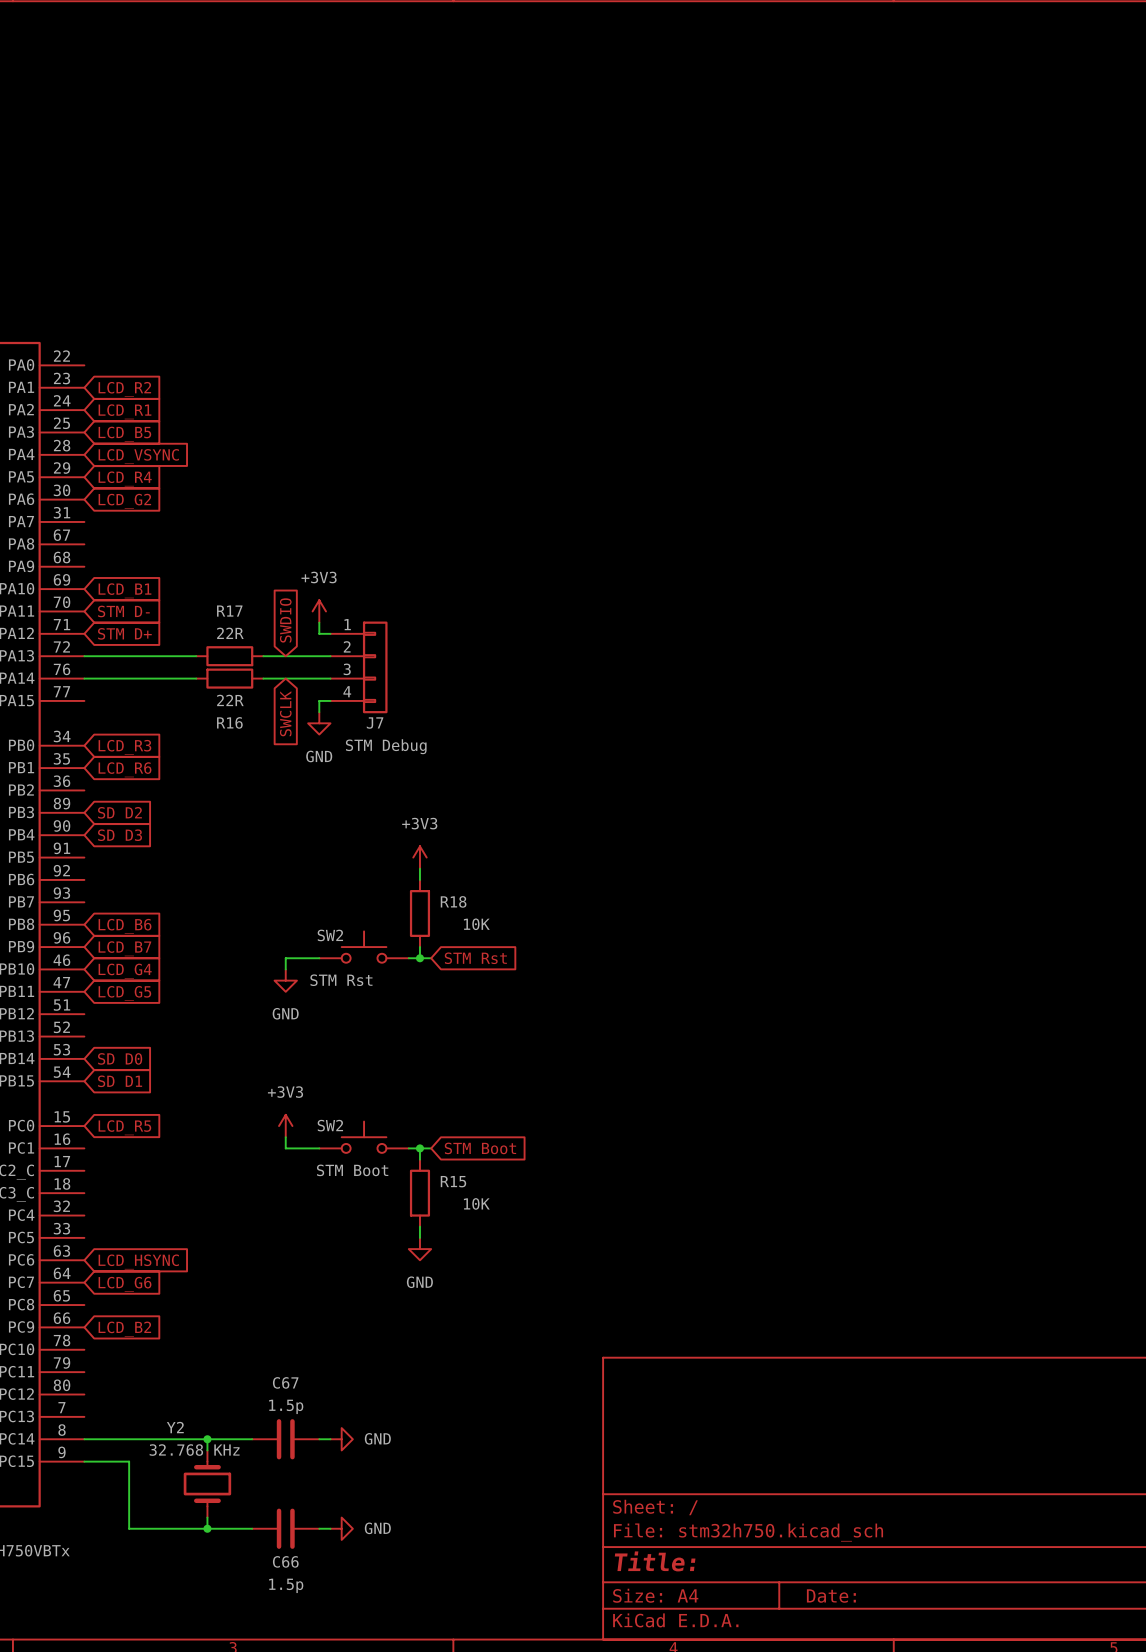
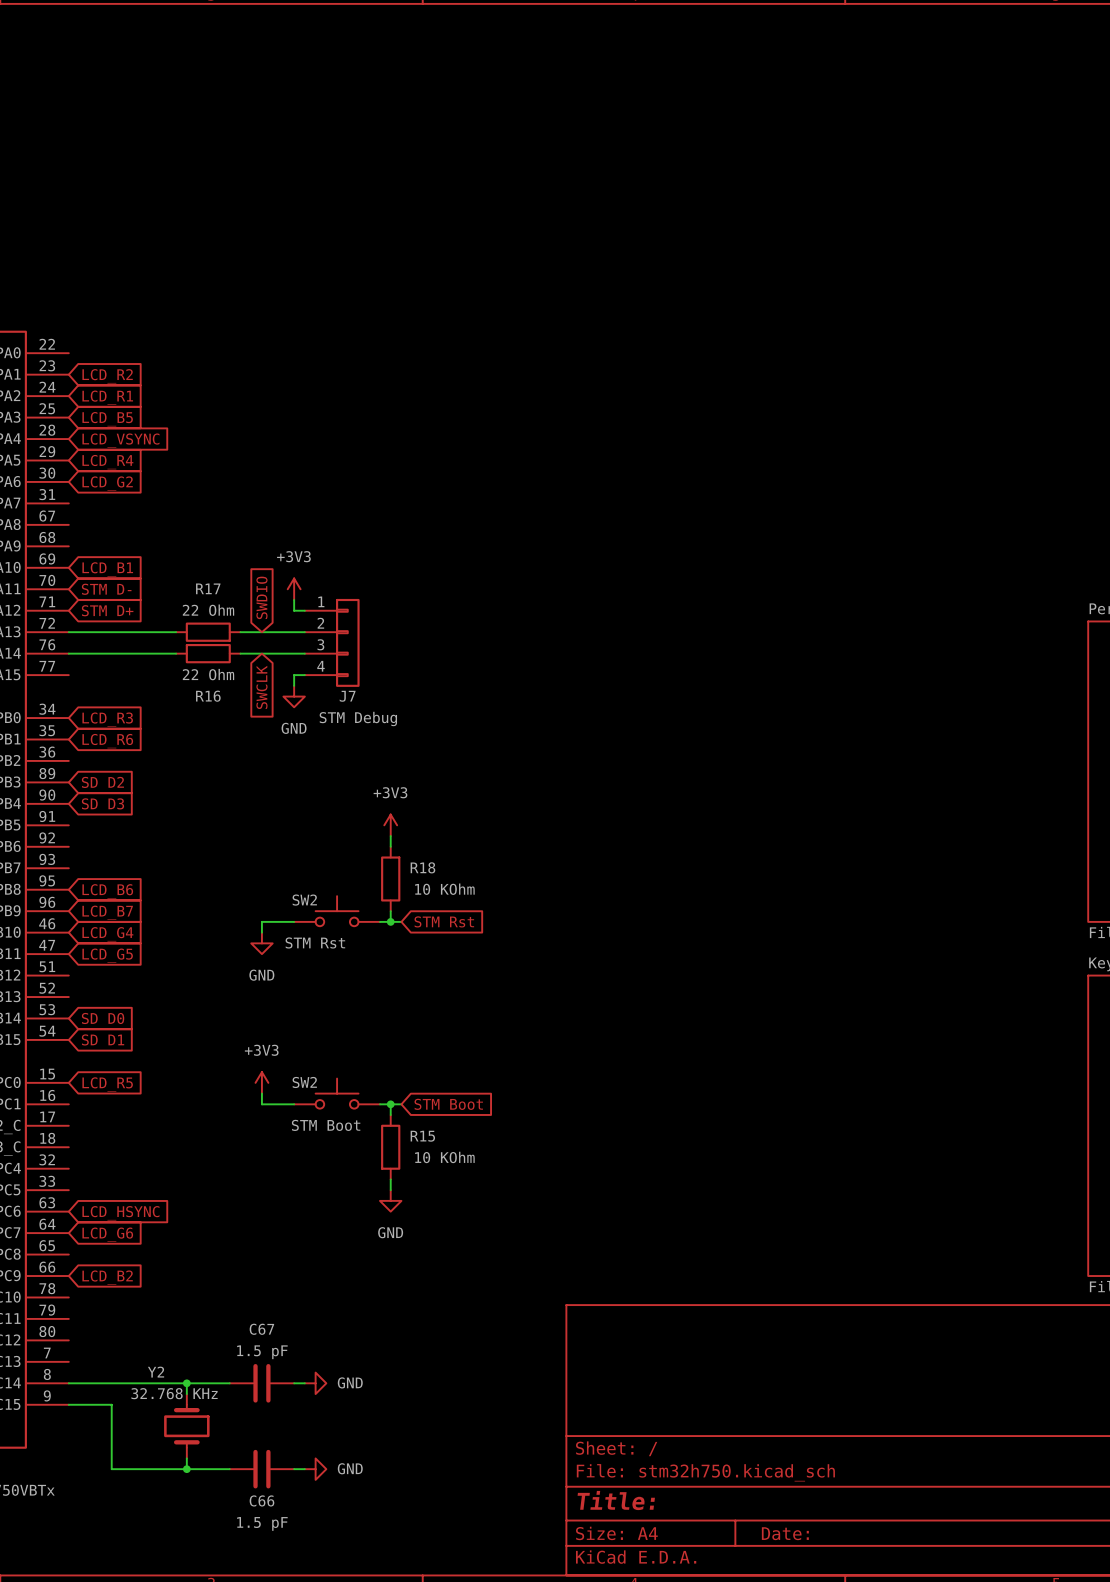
R17 value: 22R (230, 633) -> 22 Ohm (208, 610)
R16 value: 22R (230, 700) -> 22 Ohm (208, 674)
R18 value: 10K (476, 924) -> 10 KOhm (444, 889)
R15 value: 10K (476, 1203) -> 10 KOhm (444, 1157)
C67 value: 1.5p (286, 1406) -> 1.5 pF (262, 1352)
C66 value: 1.5p (286, 1585) -> 1.5 pF (262, 1523)

